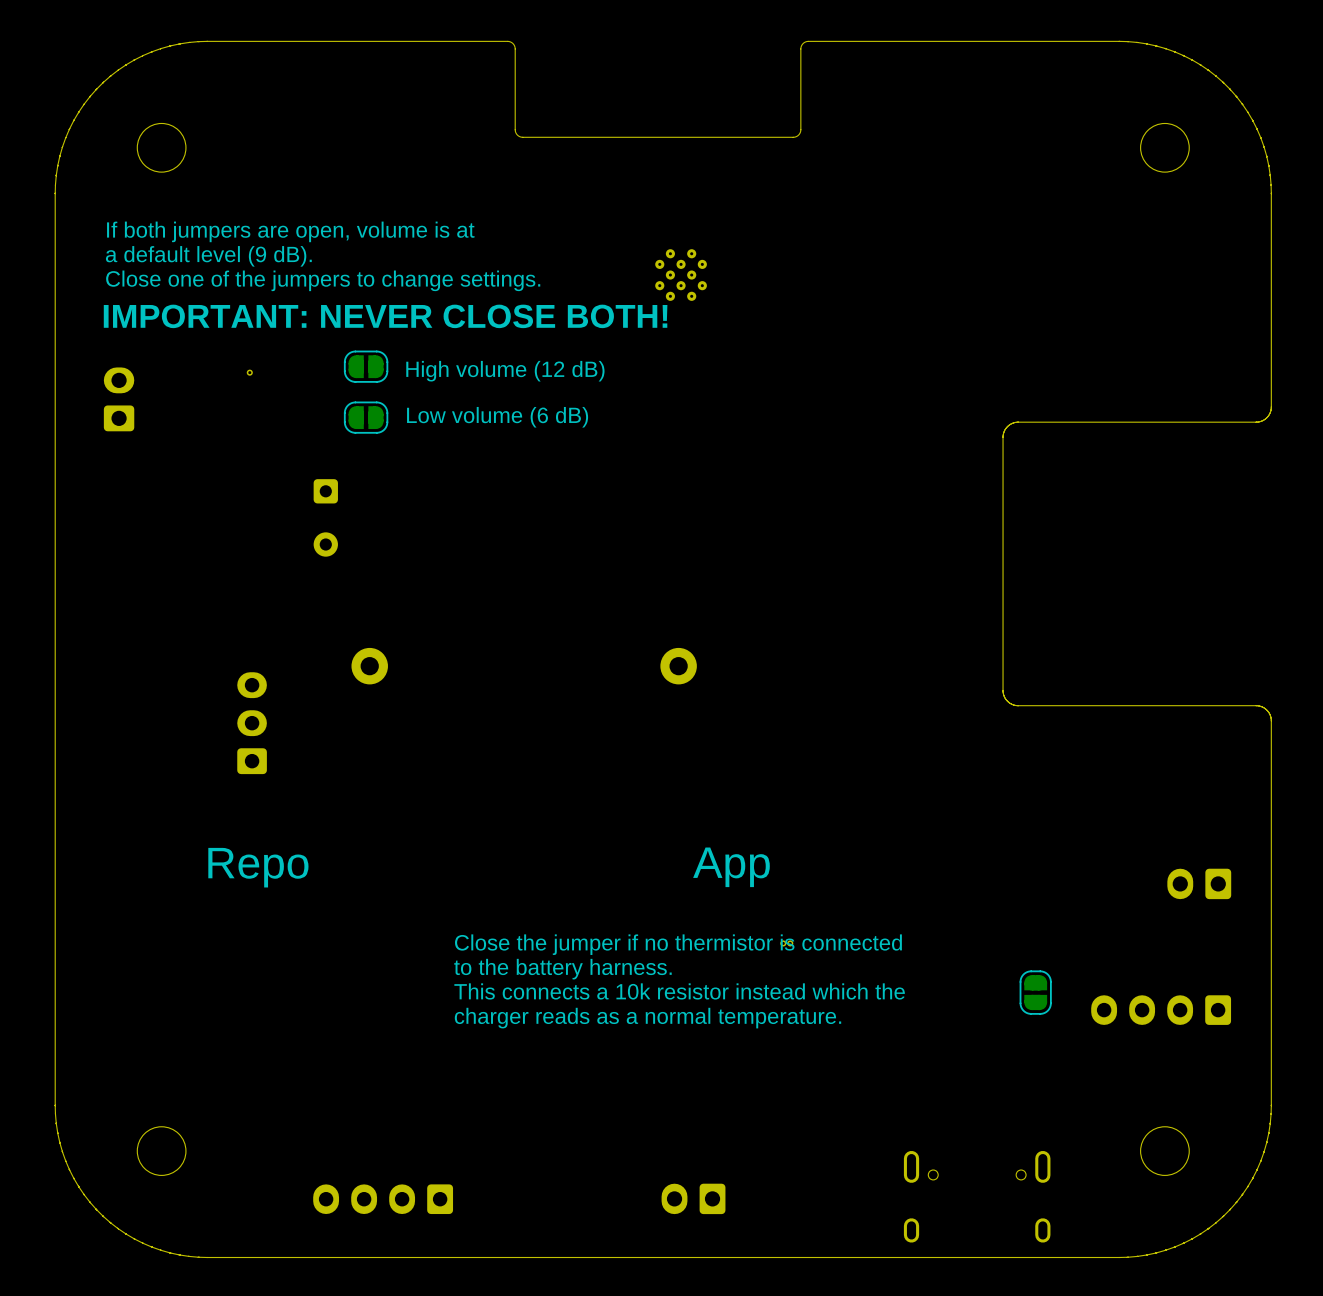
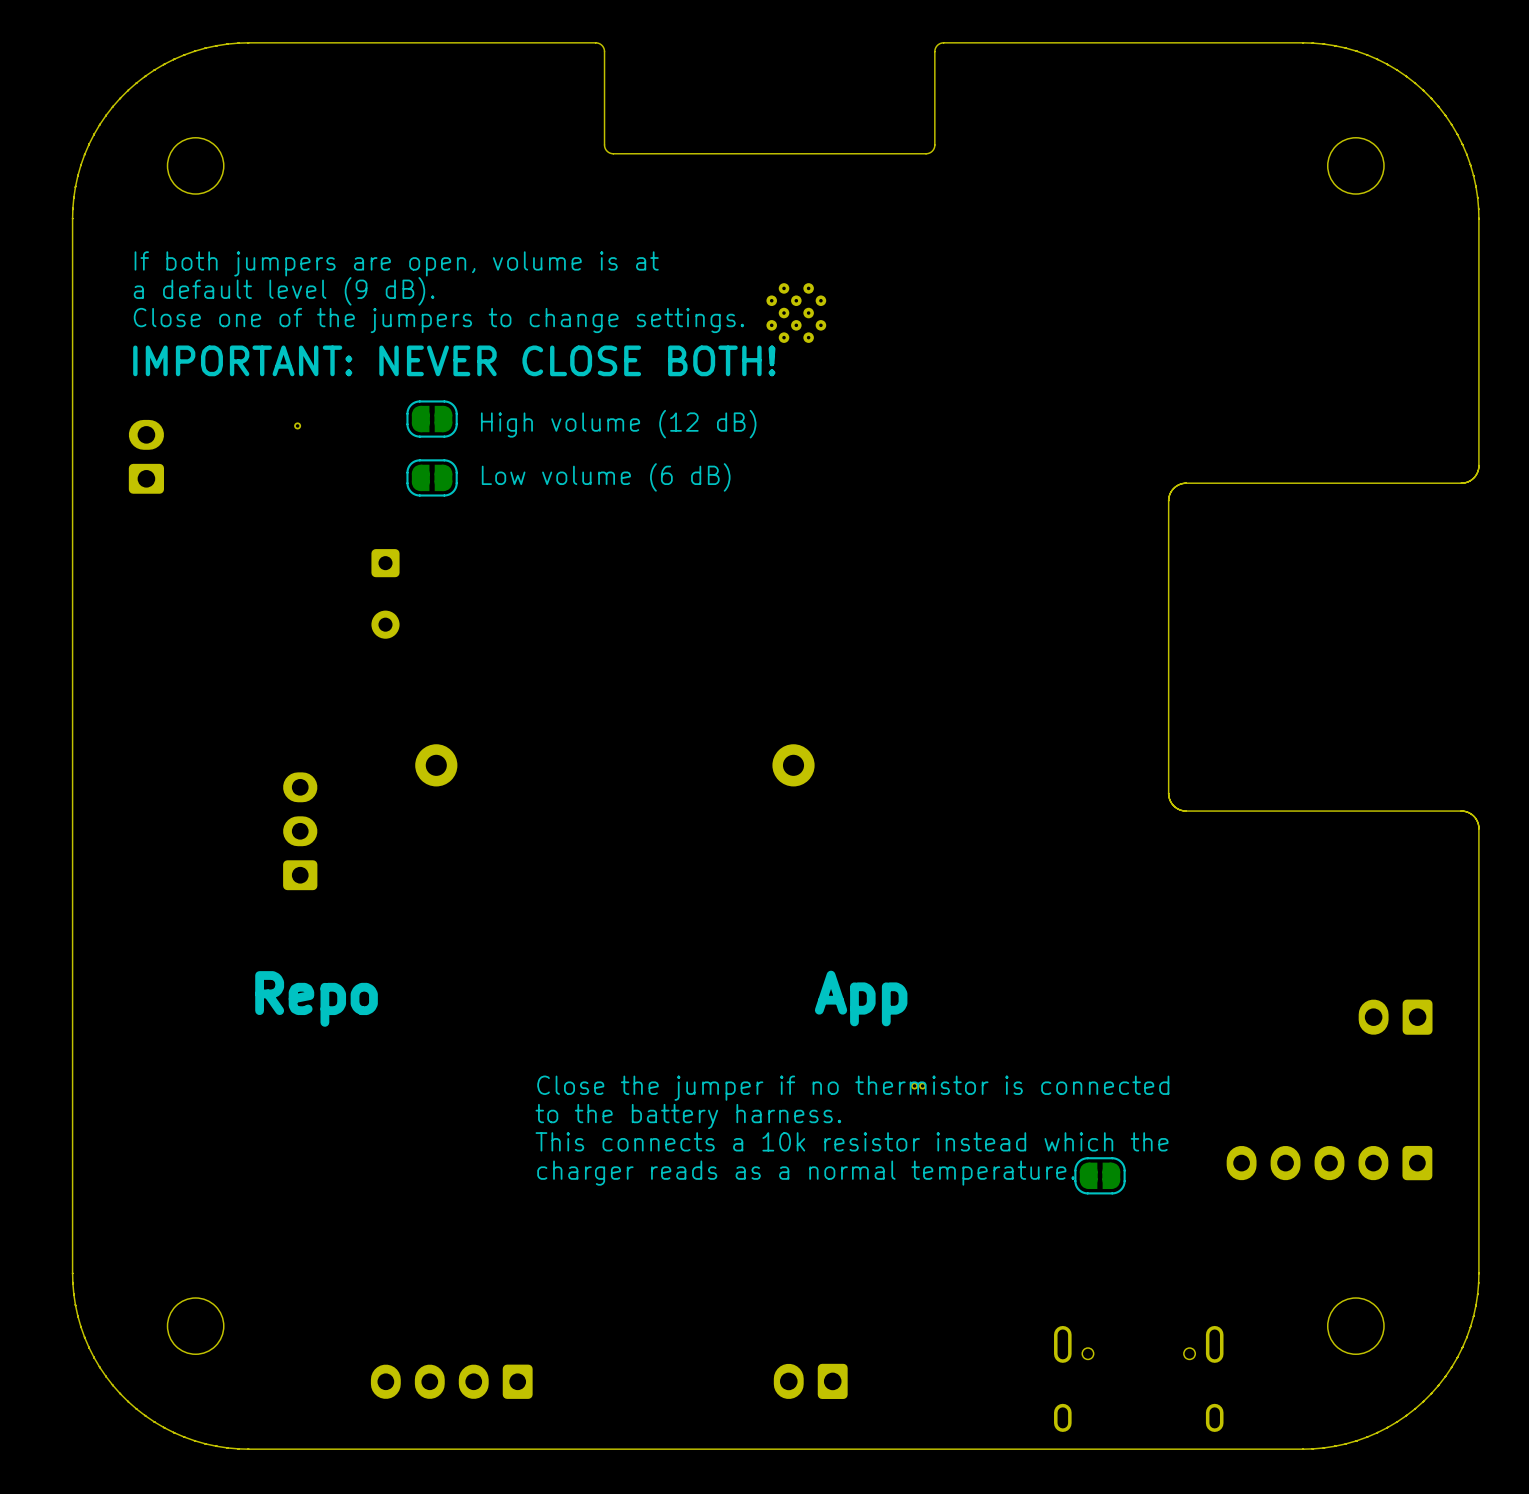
part rotation: 0° (1035, 992) -> 90° clockwise (1100, 1175)
part position: (1035, 992) -> (1100, 1175)
part: none -> (1329, 1163)

